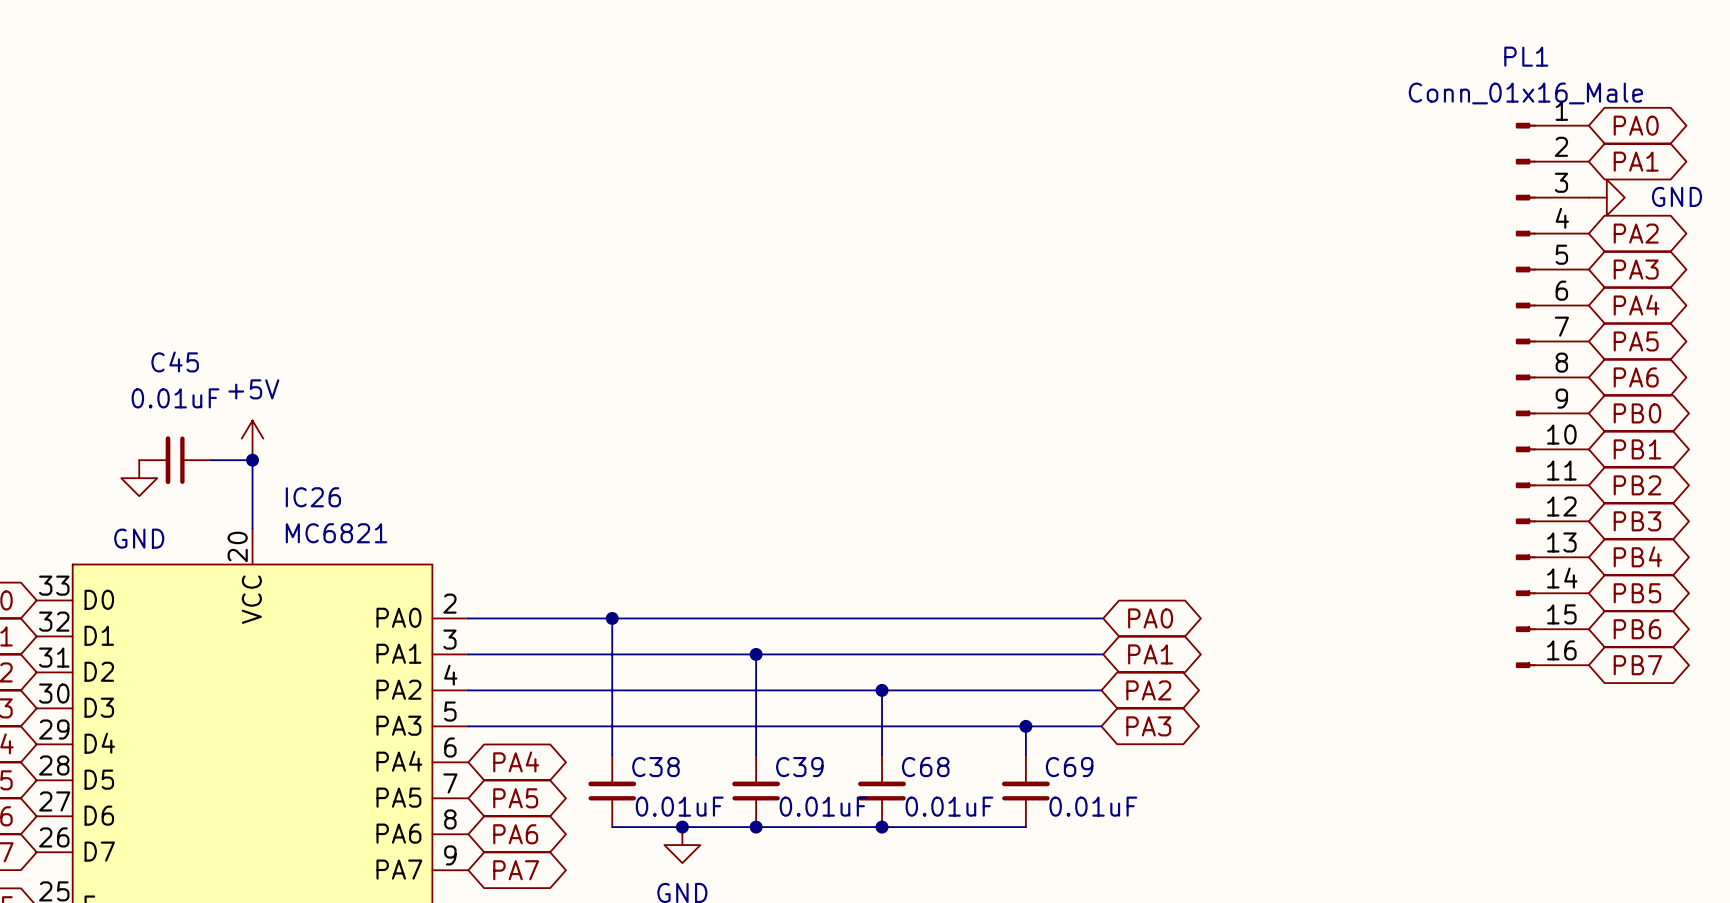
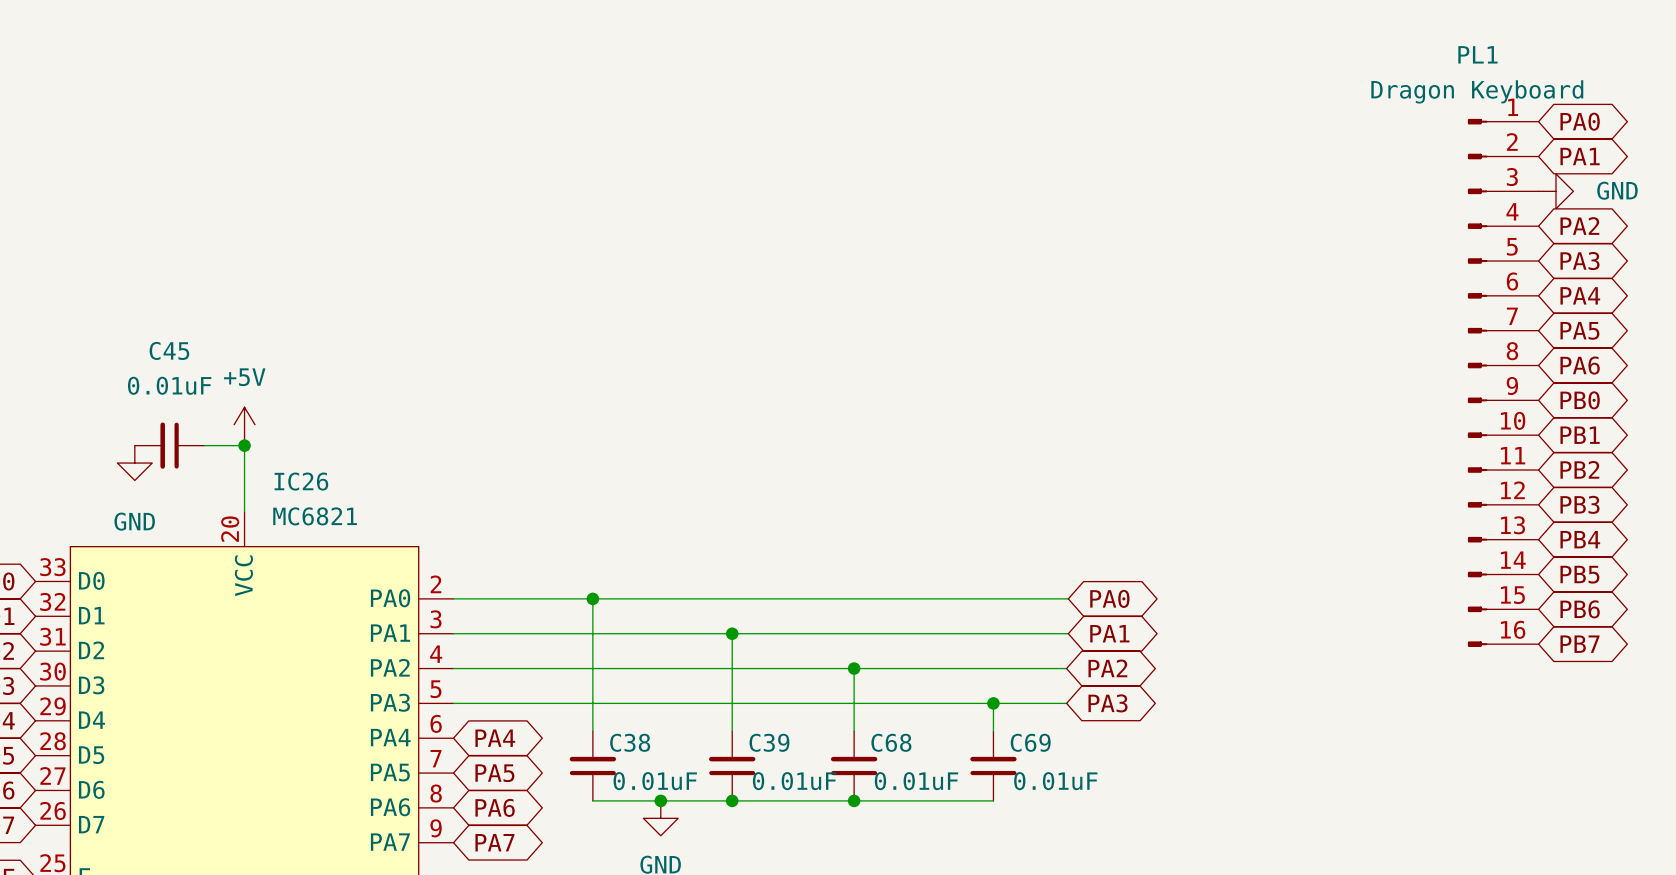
PL1 value: Conn_01x16_Male (1525, 93) -> Dragon Keyboard (1477, 91)

